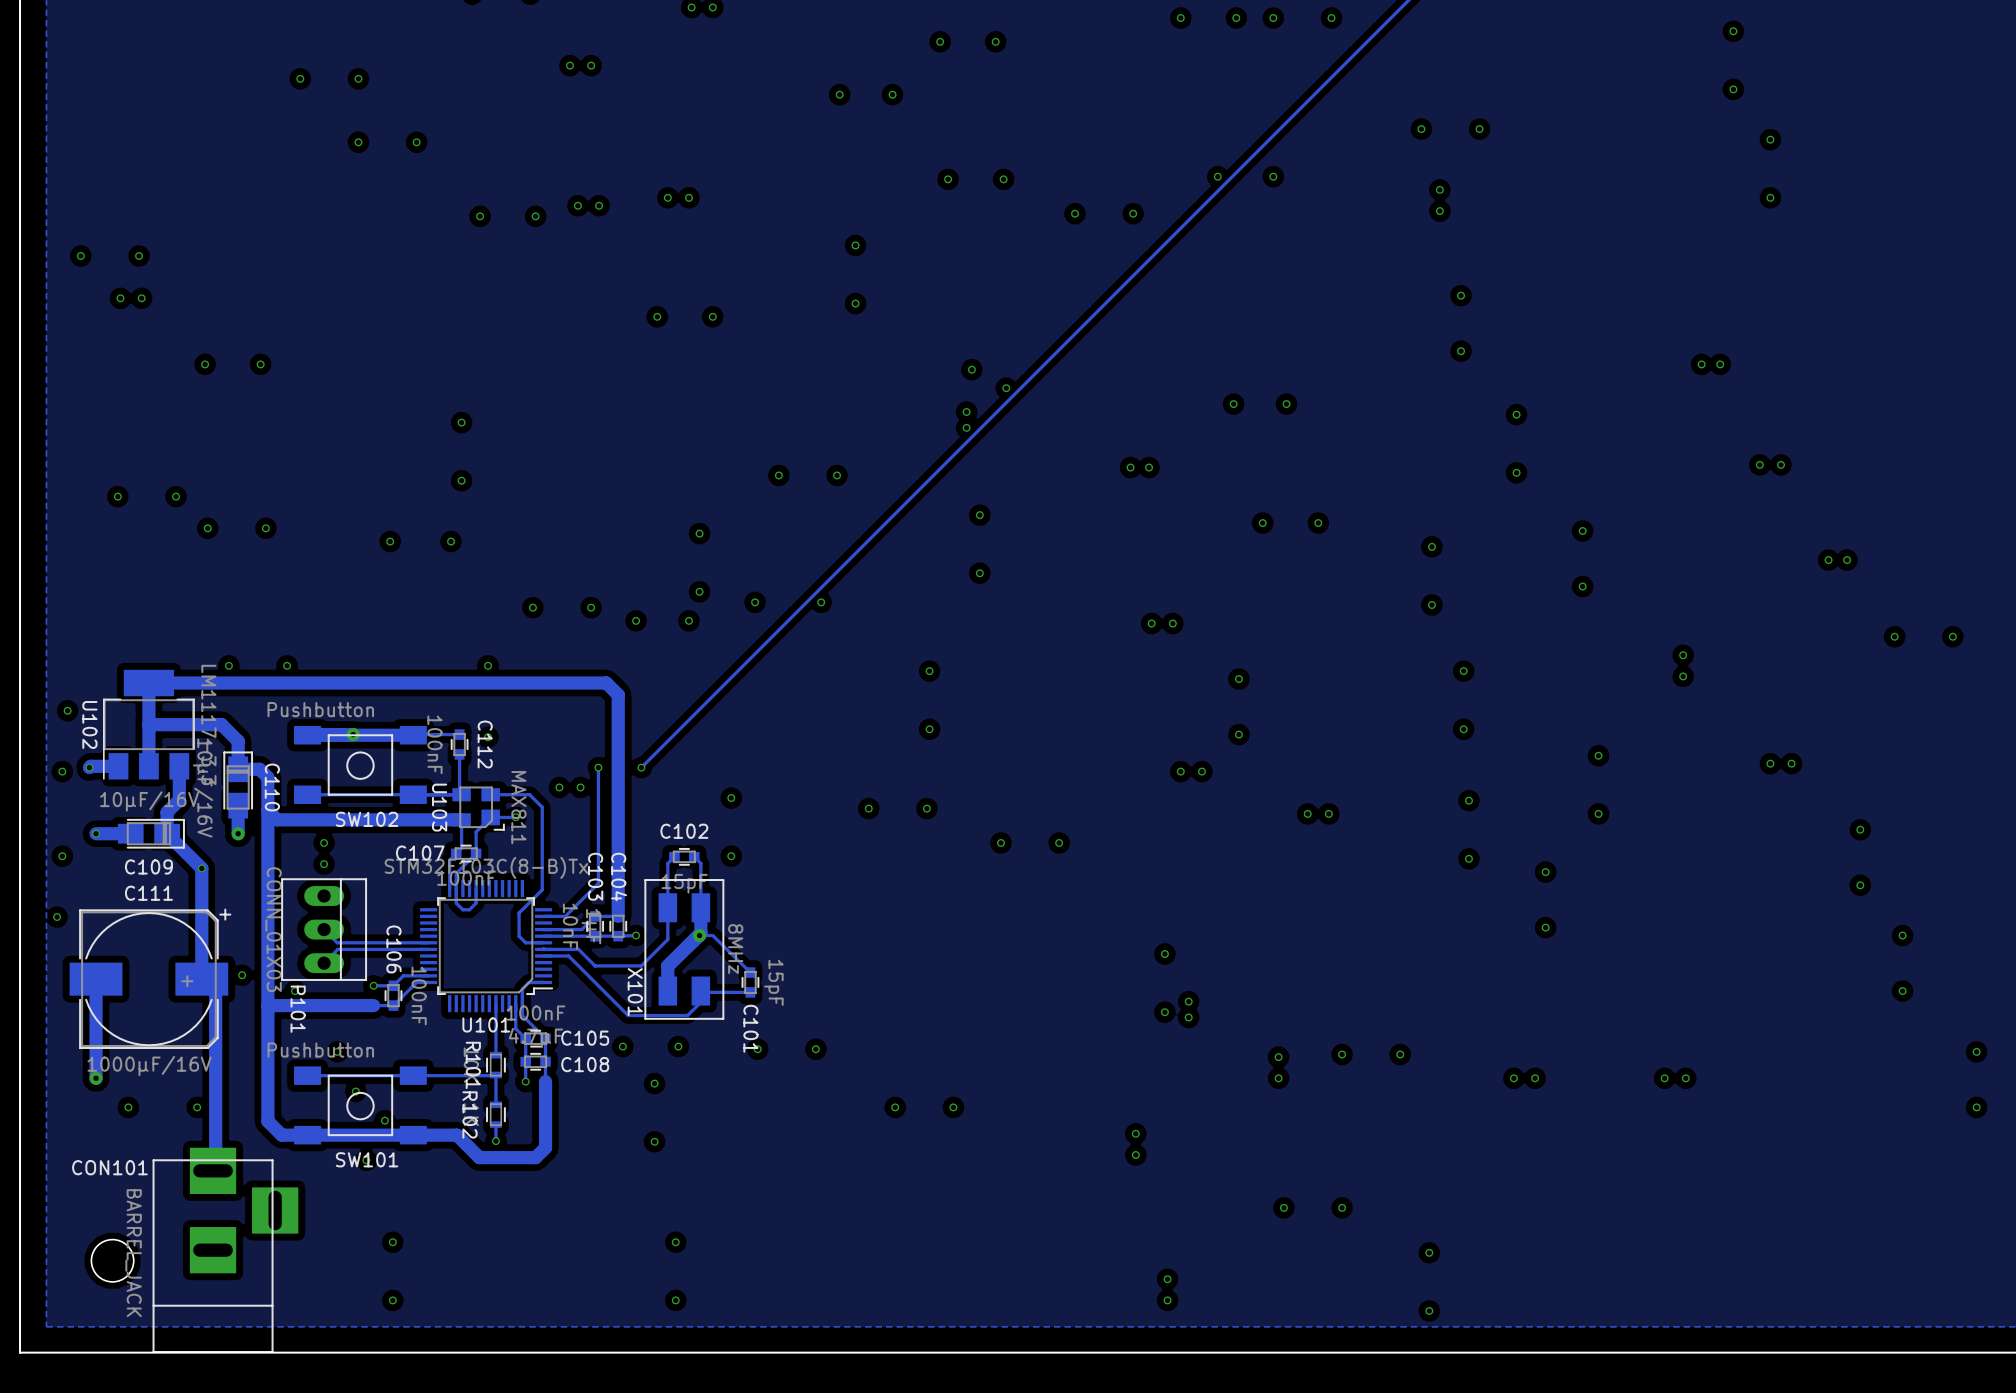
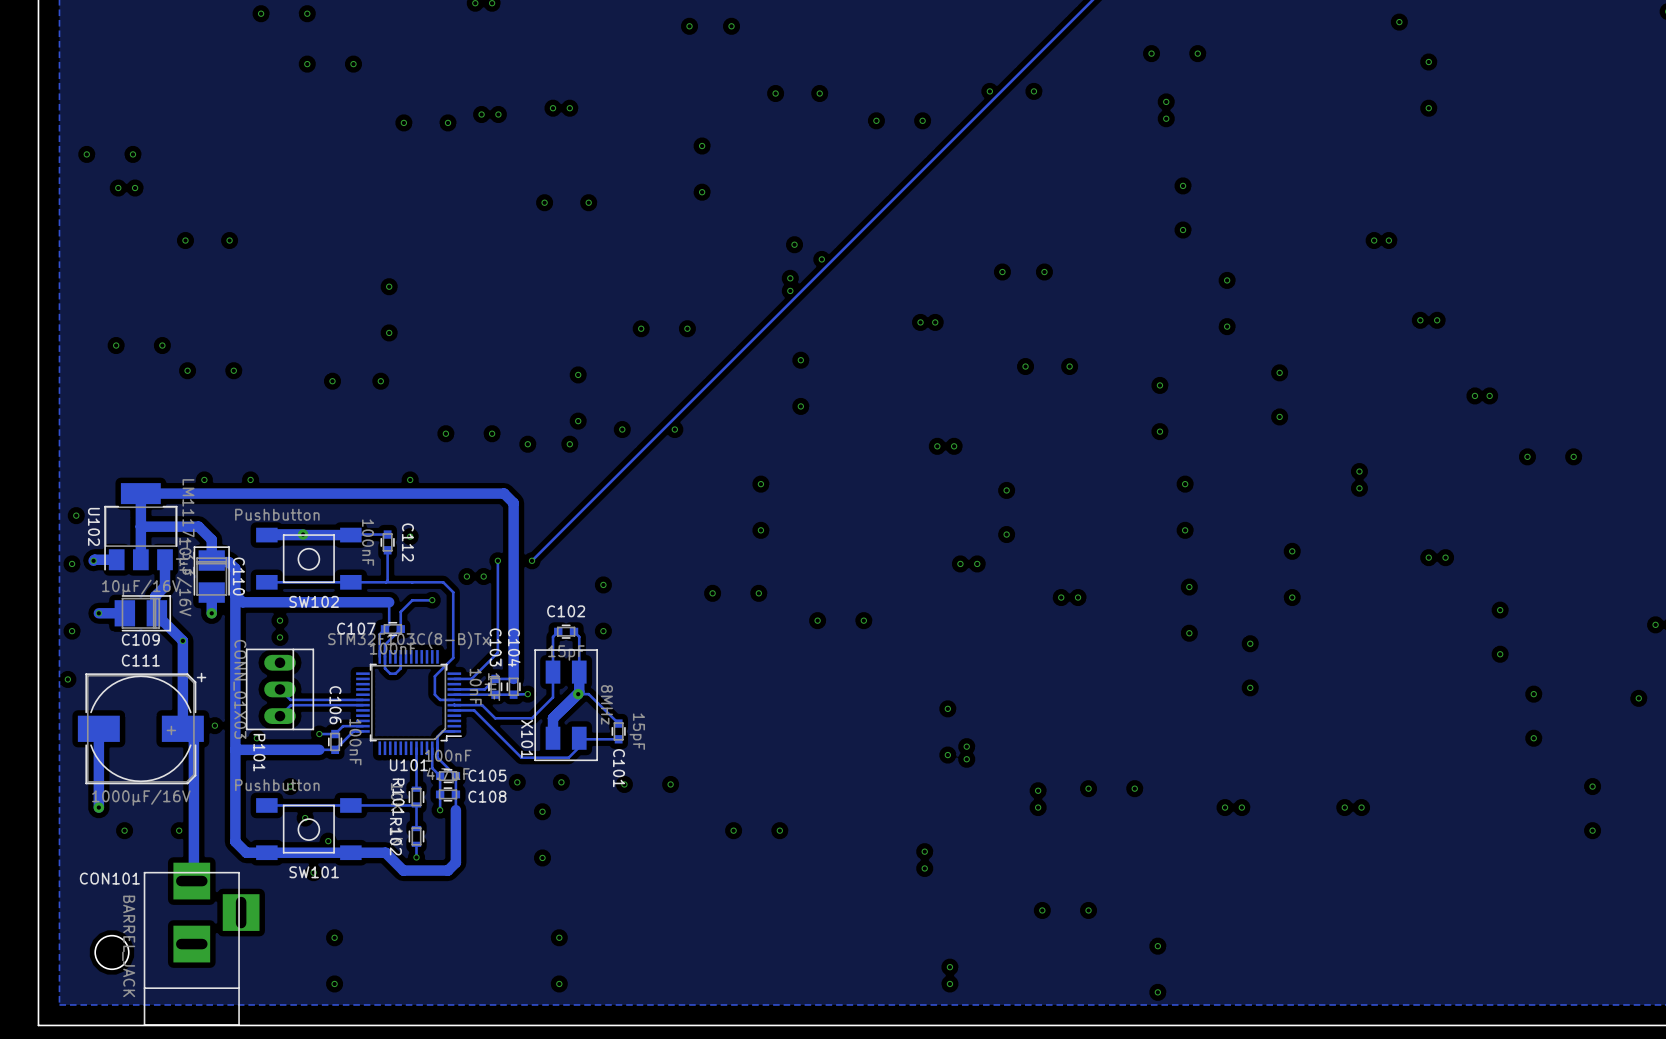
C110 footprint: [223, 751, 254, 819] -> [193, 546, 230, 603]
track: none -> (412, 582) (389, 582)
U103: MAX811 (478, 808) -> none
C109 footprint: [117, 818, 185, 849] -> [114, 595, 172, 632]

